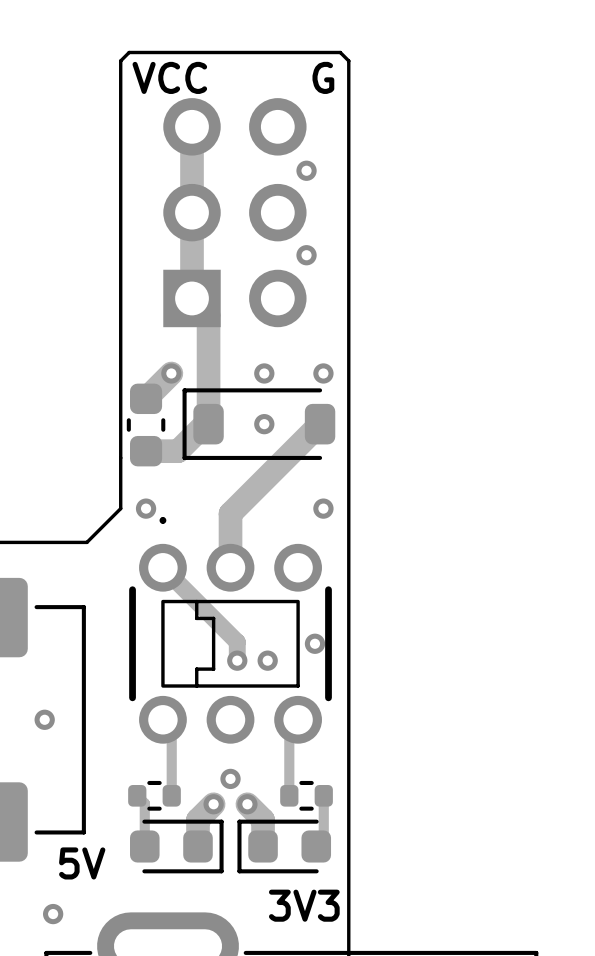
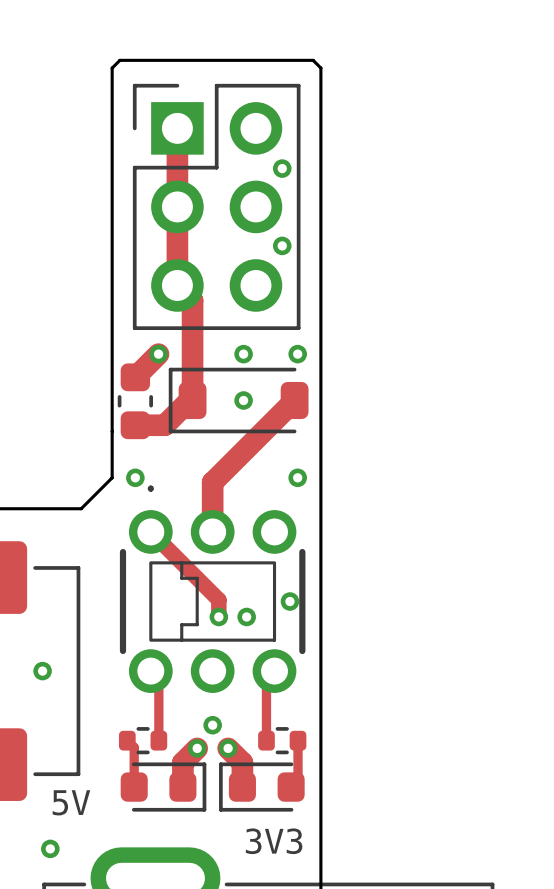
text: VCC (169, 77) -> none
text: G (323, 77) -> none
part side: bottom (234, 212) -> top (216, 206)

